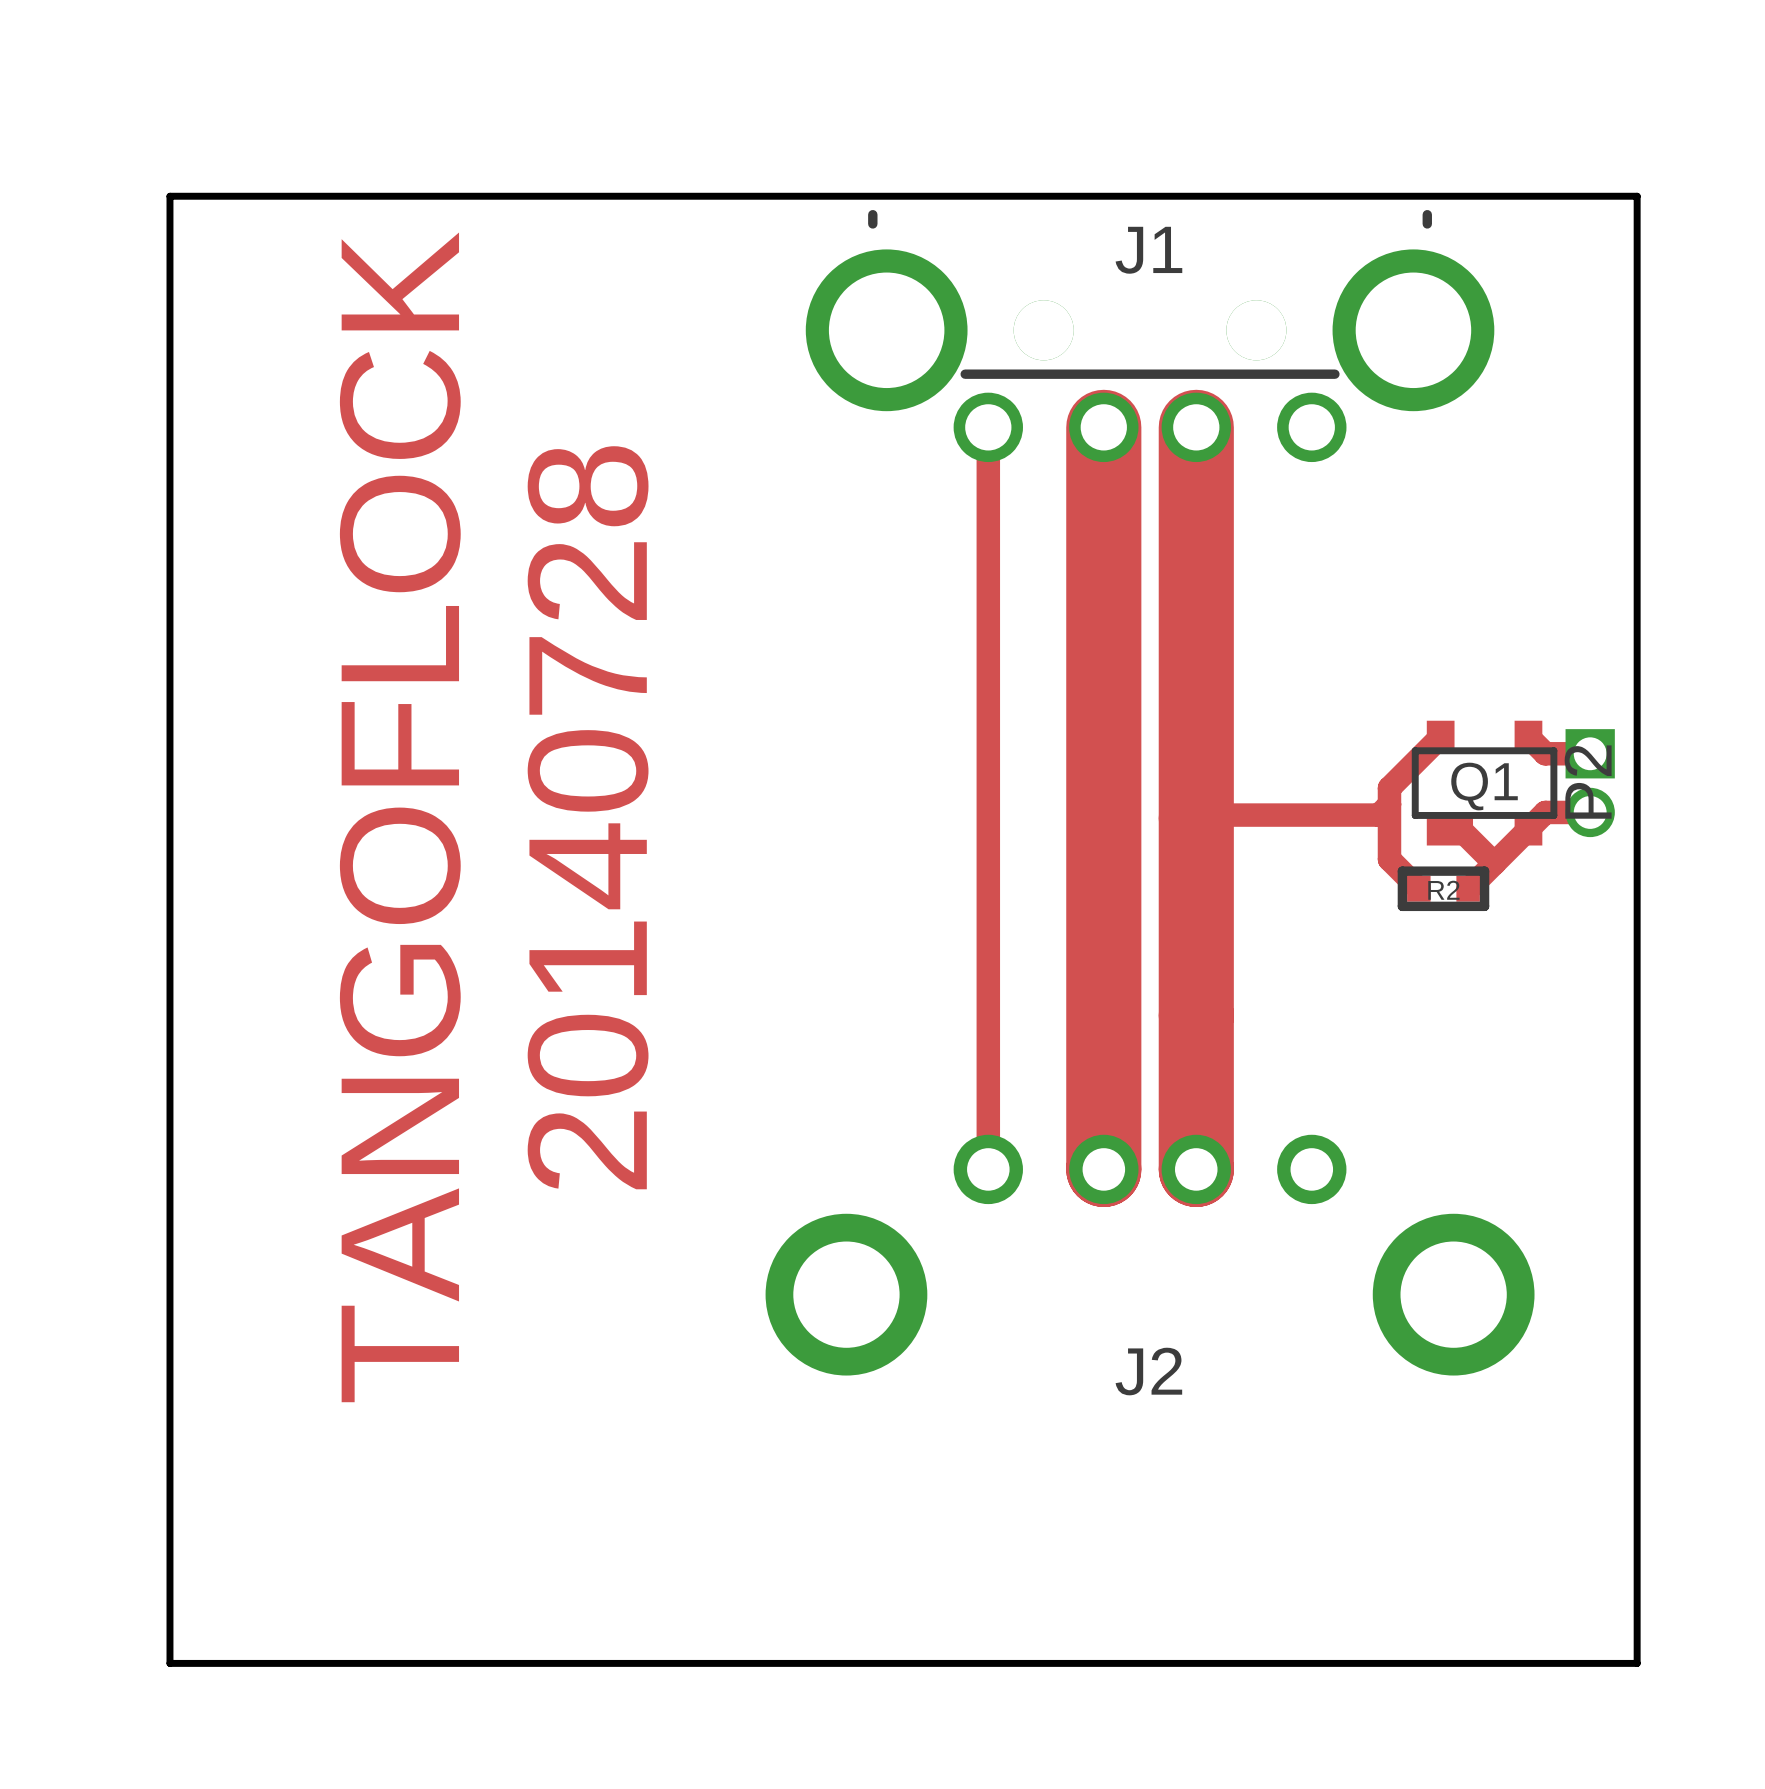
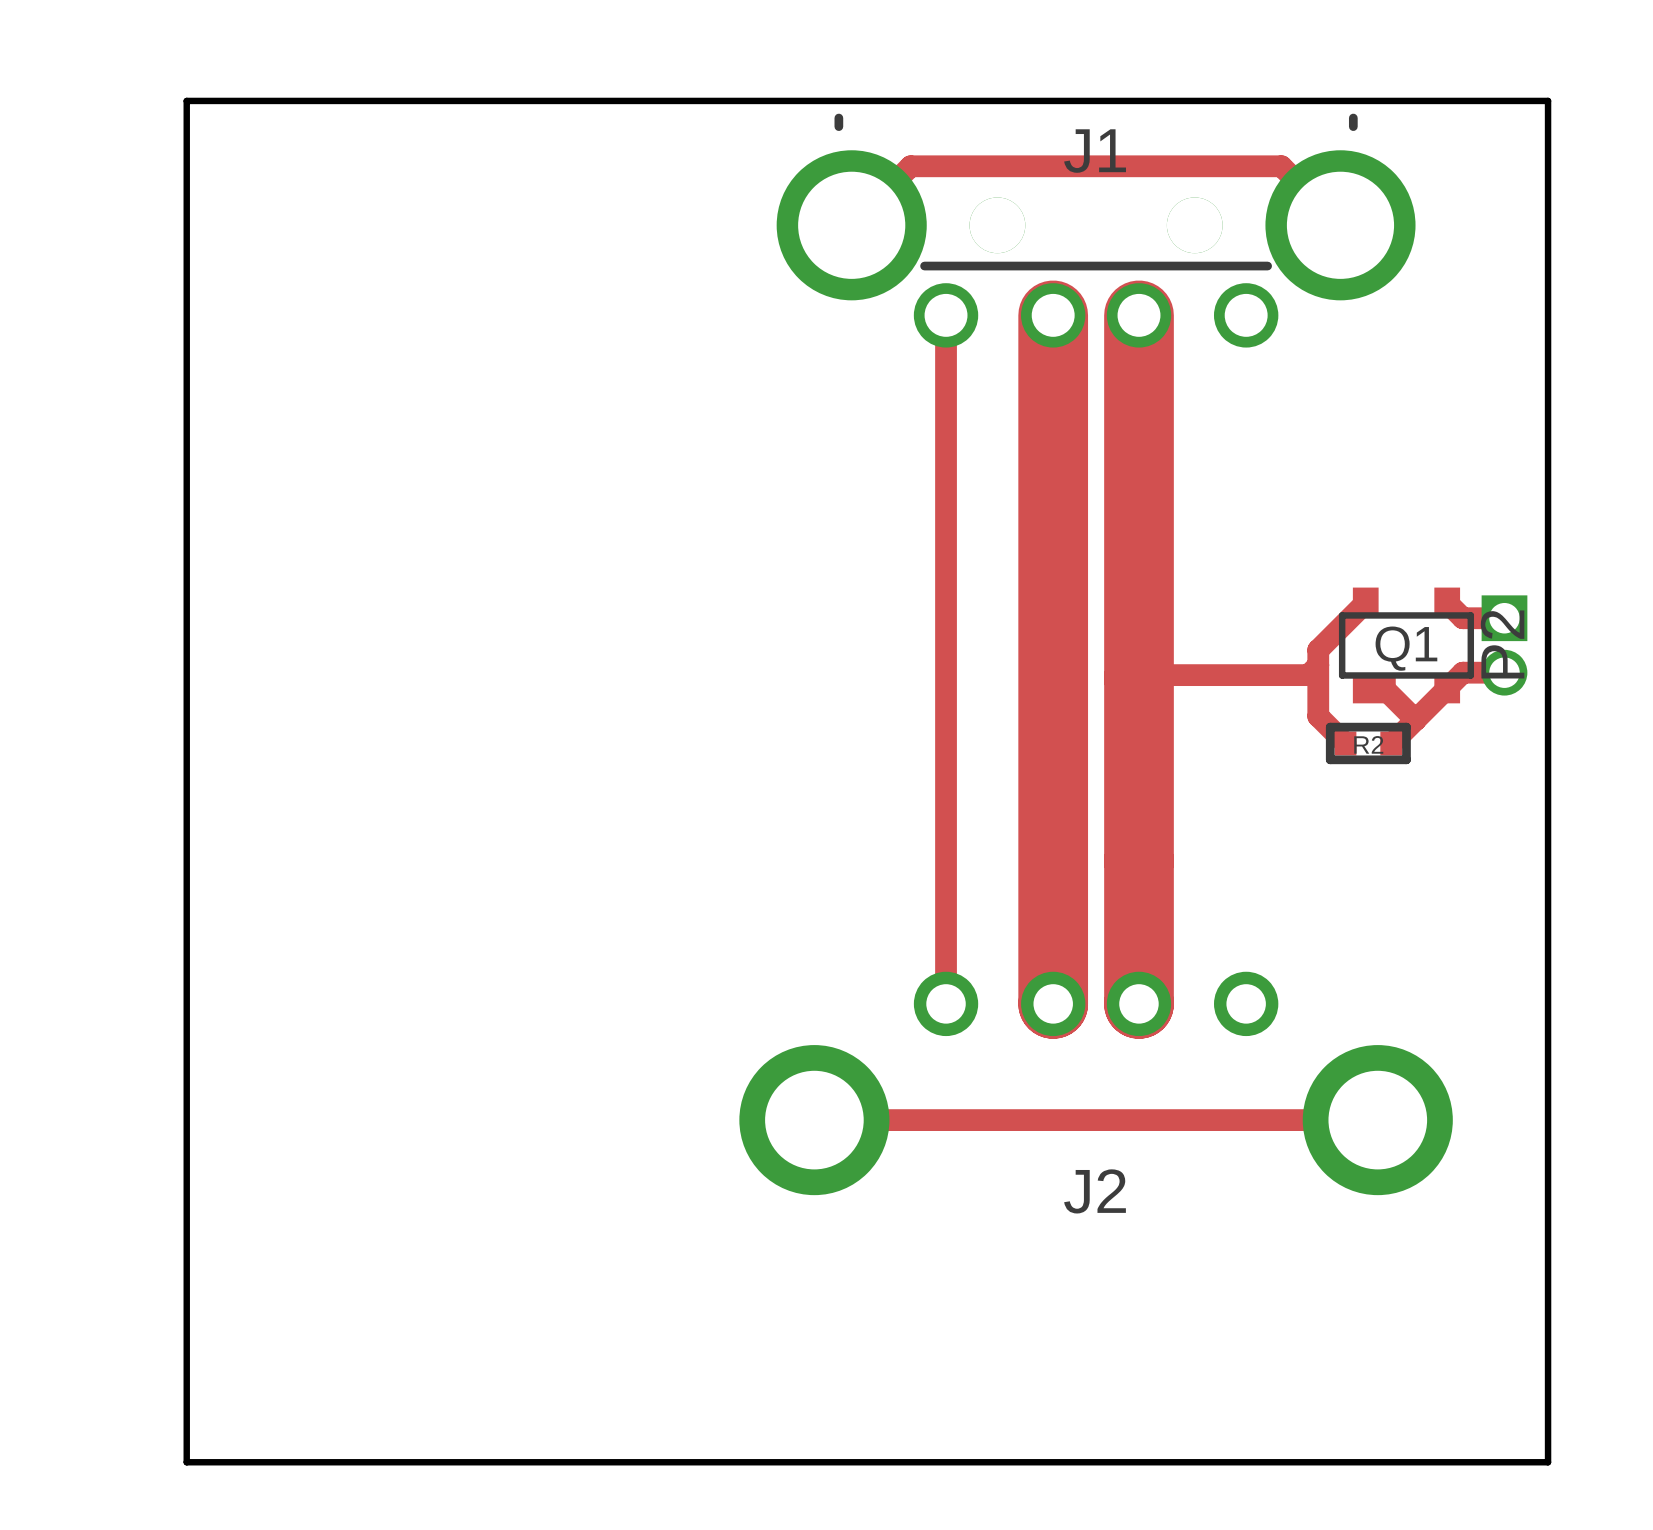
track: none -> (851, 225) (910, 166) (1281, 166) (1340, 225)
text: TANGOFLOCK (400, 817) -> none
text: 20140728 (588, 817) -> none
track: none -> (814, 1120) (1377, 1120)

